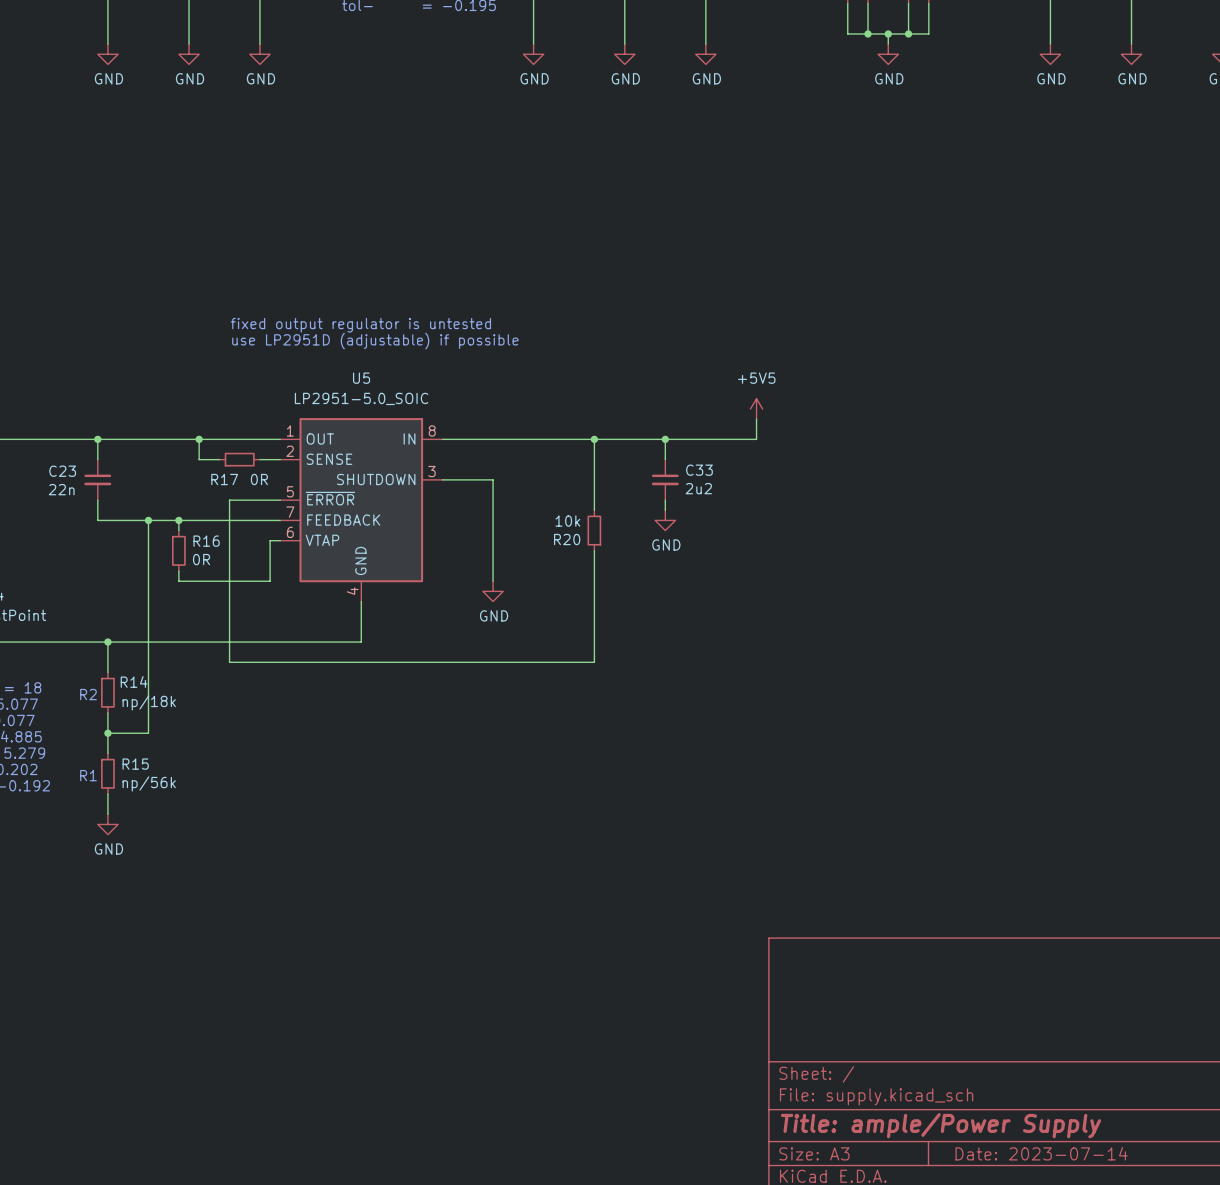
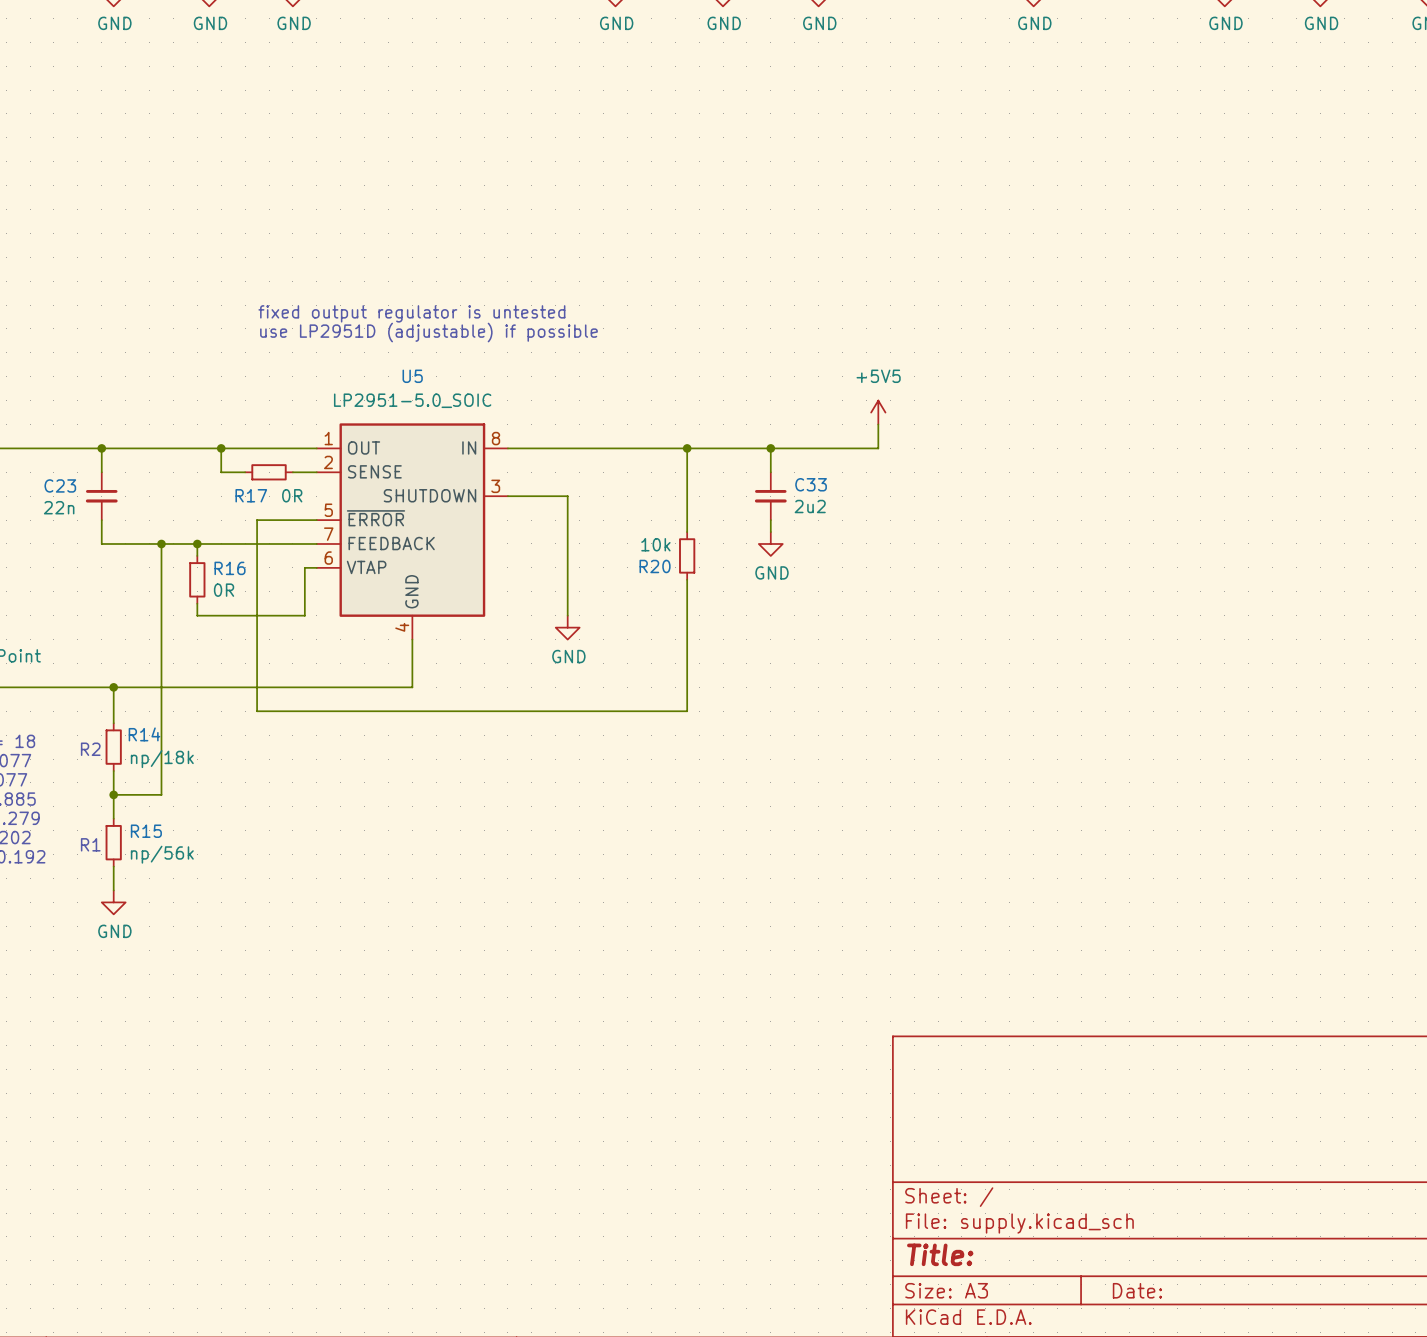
title block: Title: ample/Power Supply (941, 1125) -> Title: (940, 1254)
title block: Date: 2023-07-14 (1041, 1153) -> Date: (1137, 1290)

